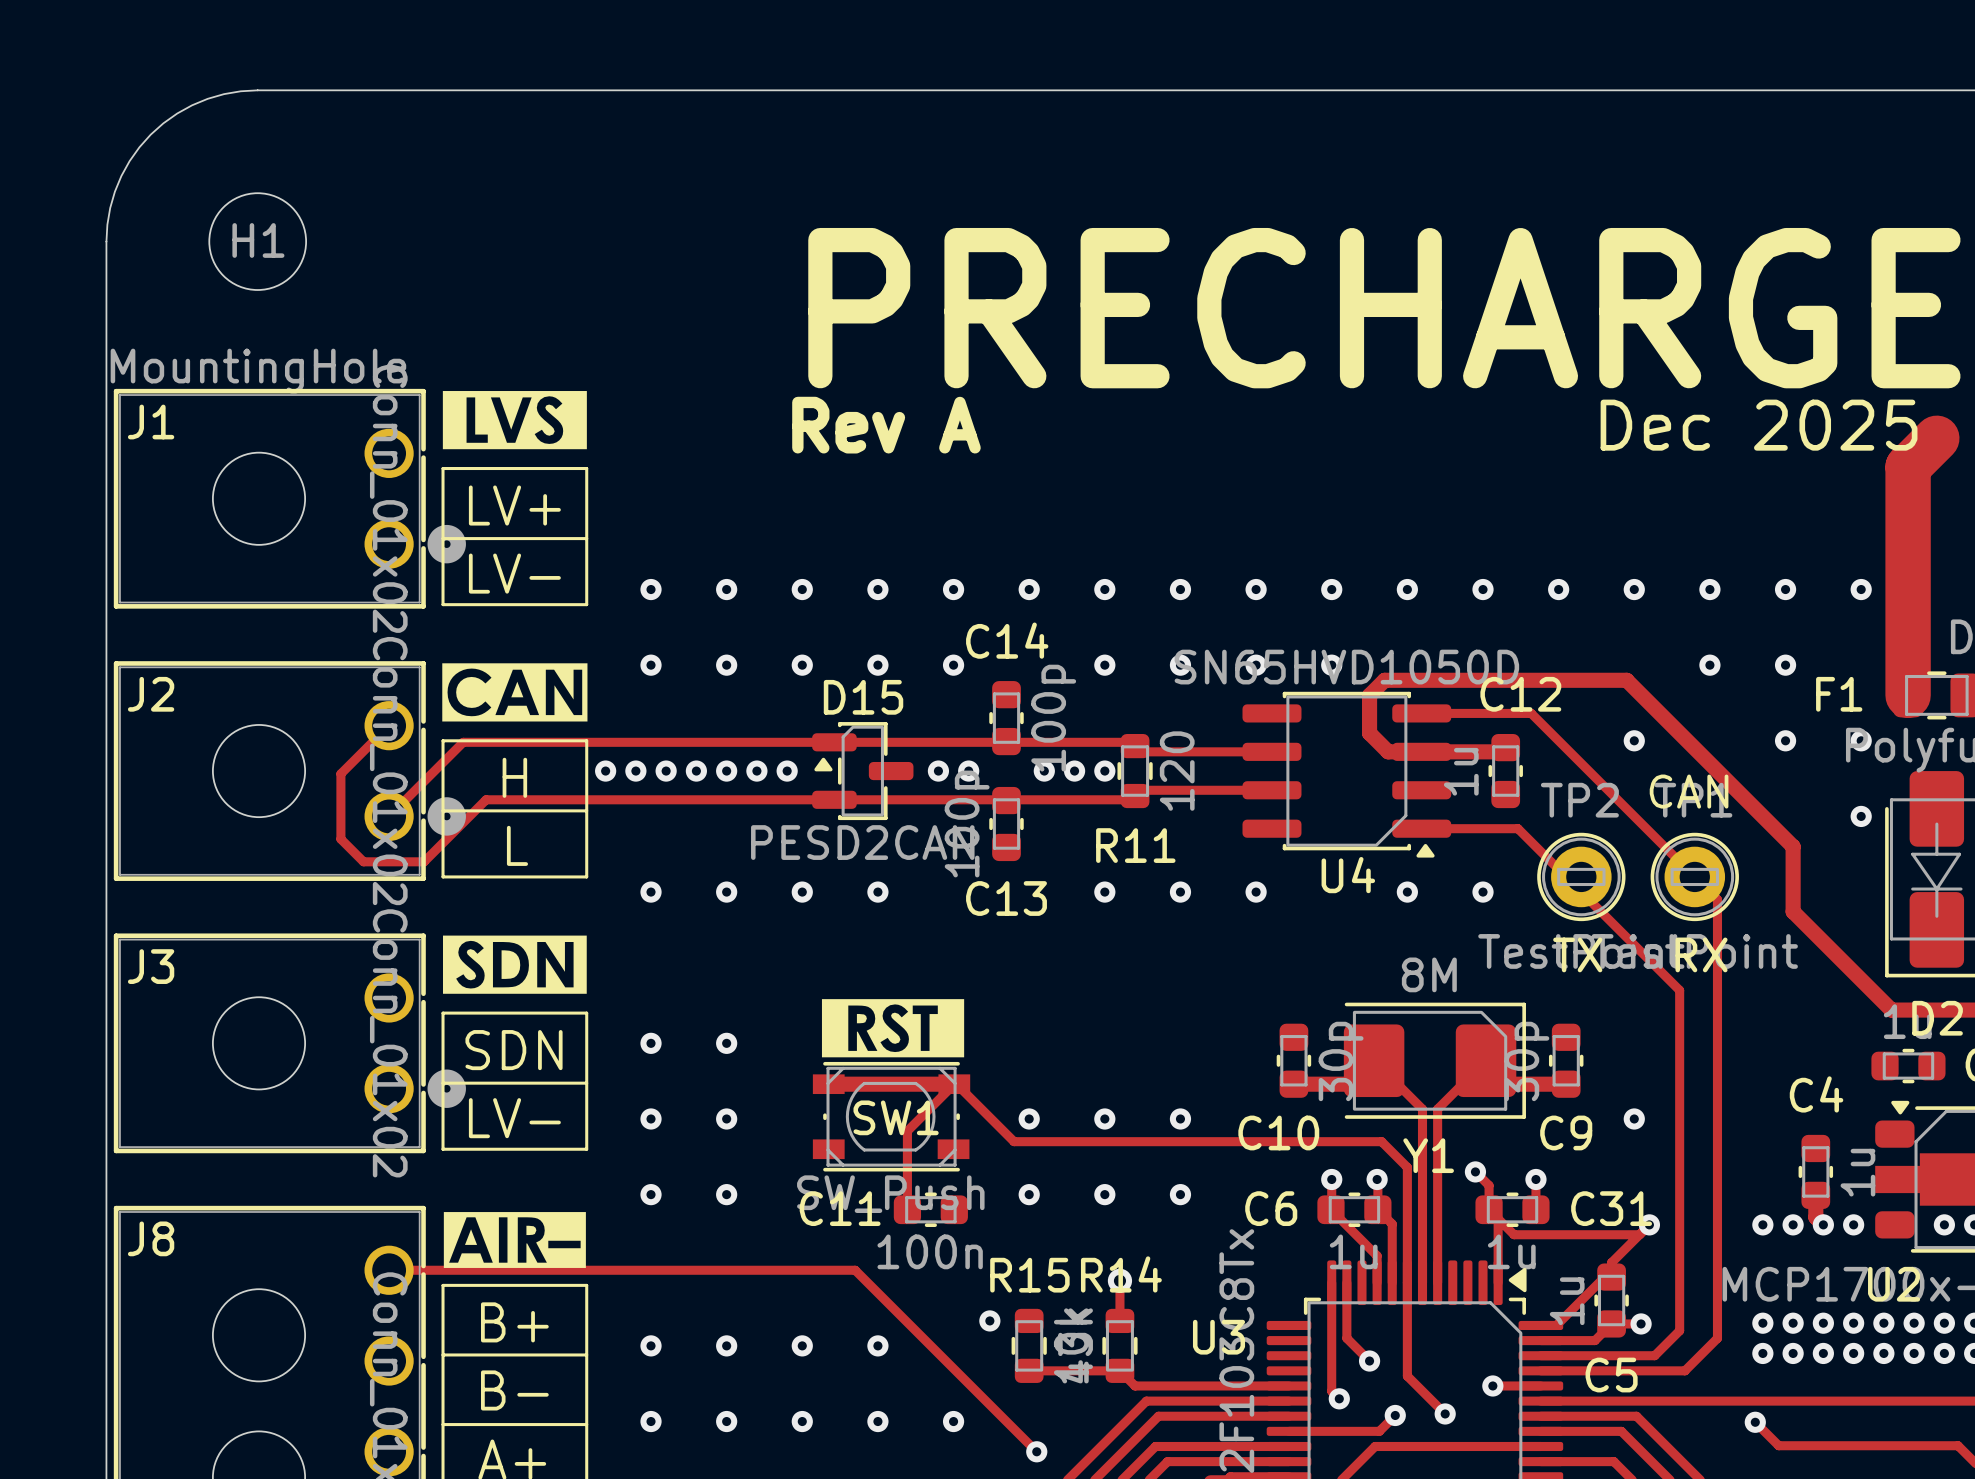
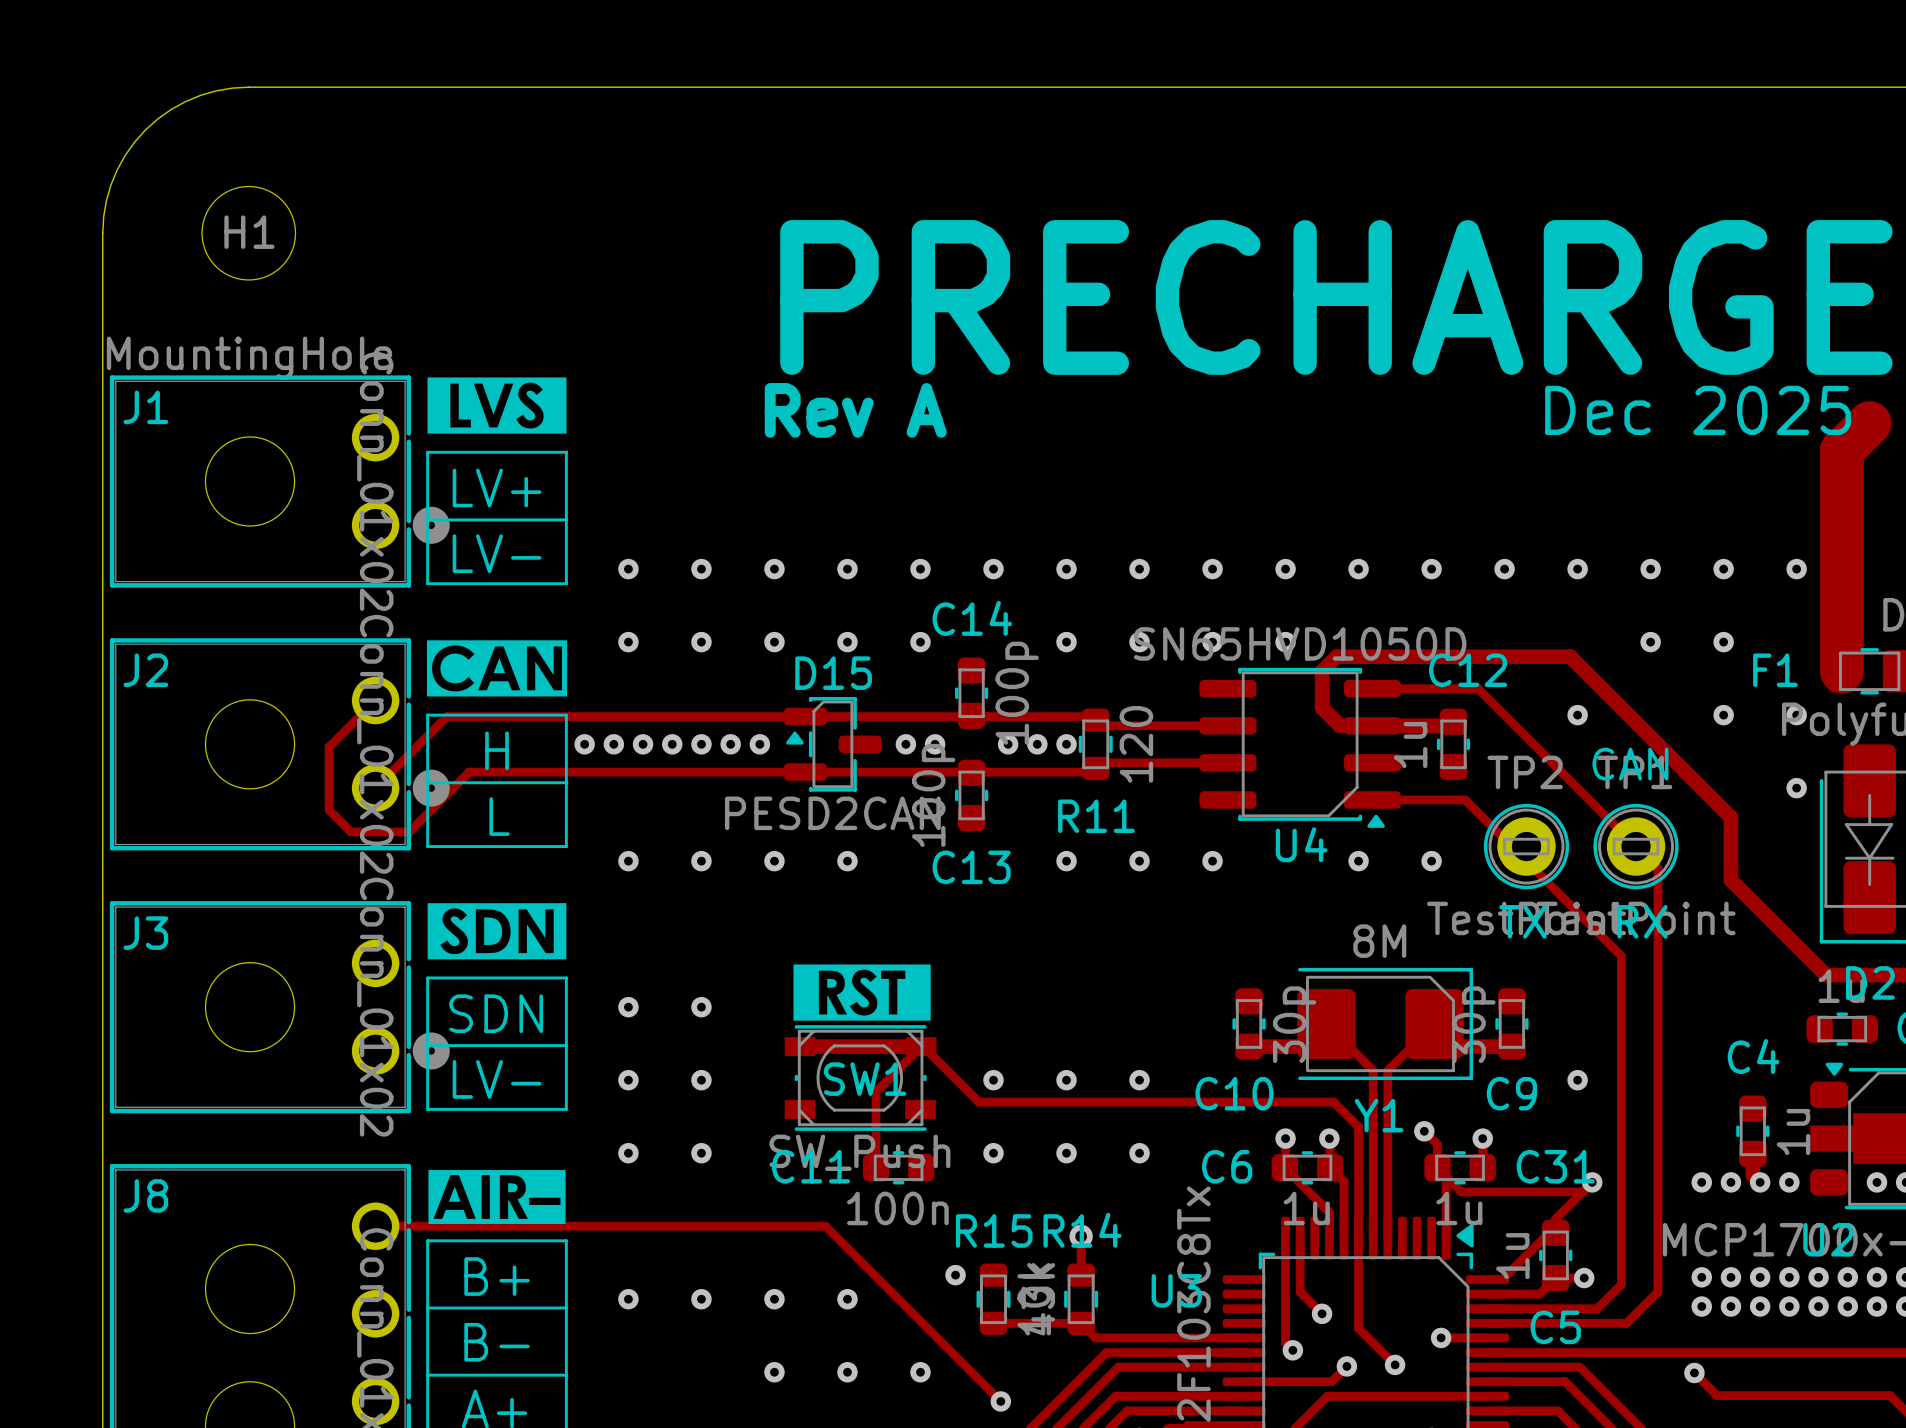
via: (651, 1421) -> none
via: (726, 1421) -> none

